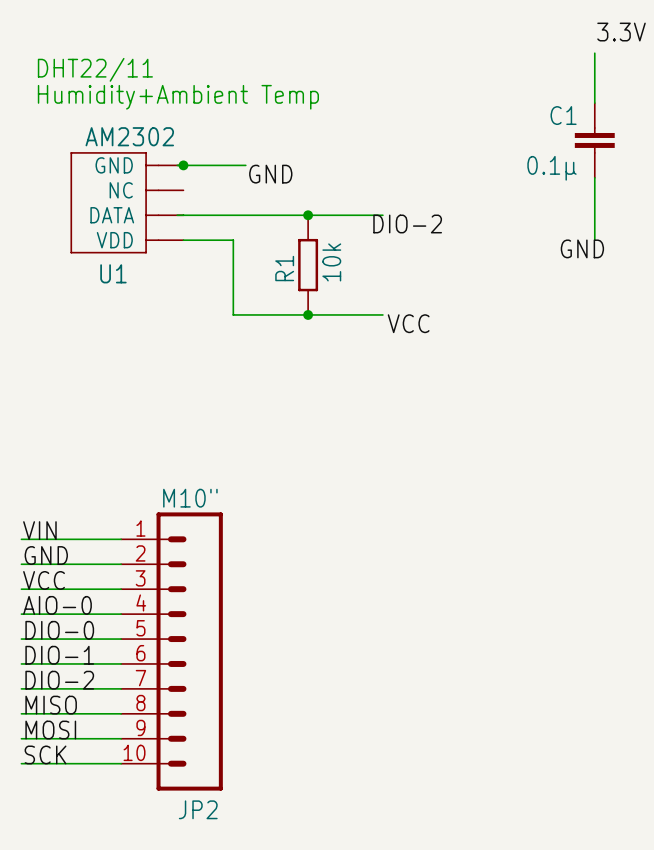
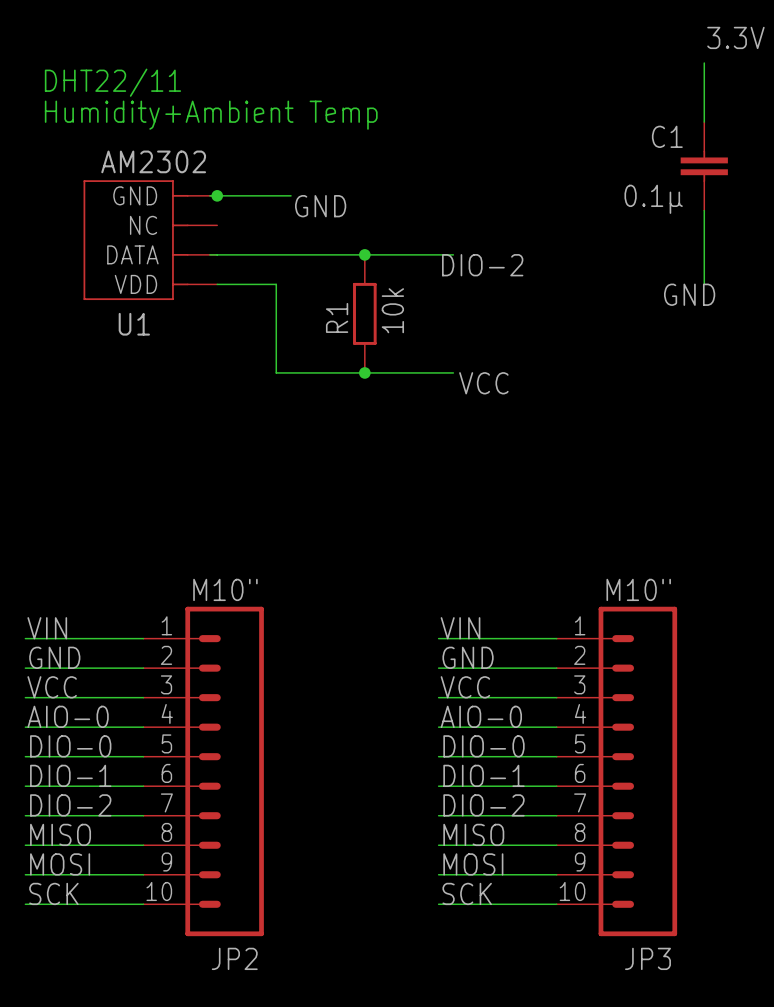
label: none -> VIN (460, 628)
wire: none -> (438, 638) (556, 638)
label: none -> GND (468, 657)
wire: none -> (438, 668) (556, 668)
label: none -> VCC (465, 687)
wire: none -> (438, 697) (556, 697)
label: none -> AIO-0 (481, 716)
wire: none -> (438, 727) (556, 727)
label: none -> DIO-0 (483, 746)
wire: none -> (438, 756) (556, 756)
JP3: none -> M10" (616, 771)
label: none -> DIO-1 (483, 775)
wire: none -> (438, 786) (556, 786)
label: none -> DIO-2 (483, 805)
wire: none -> (438, 815) (556, 815)
label: none -> MISO (473, 834)
wire: none -> (438, 845) (556, 845)
label: none -> MOSI (473, 864)
wire: none -> (438, 874) (556, 874)
label: none -> SCK (467, 893)
wire: none -> (438, 904) (556, 904)

